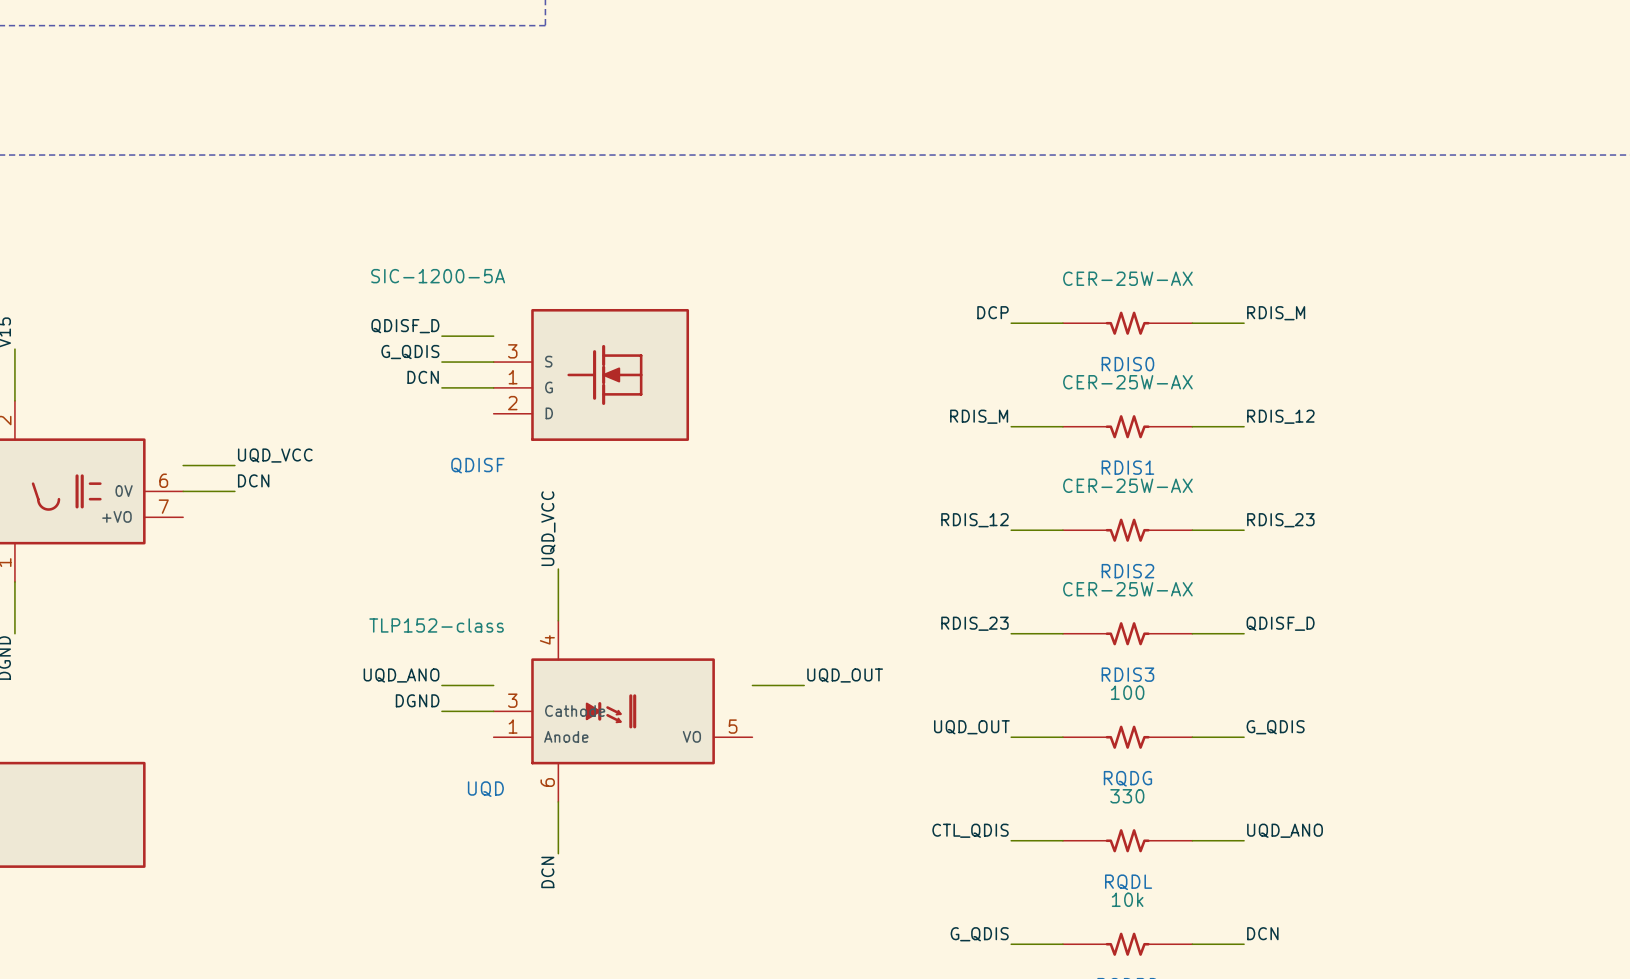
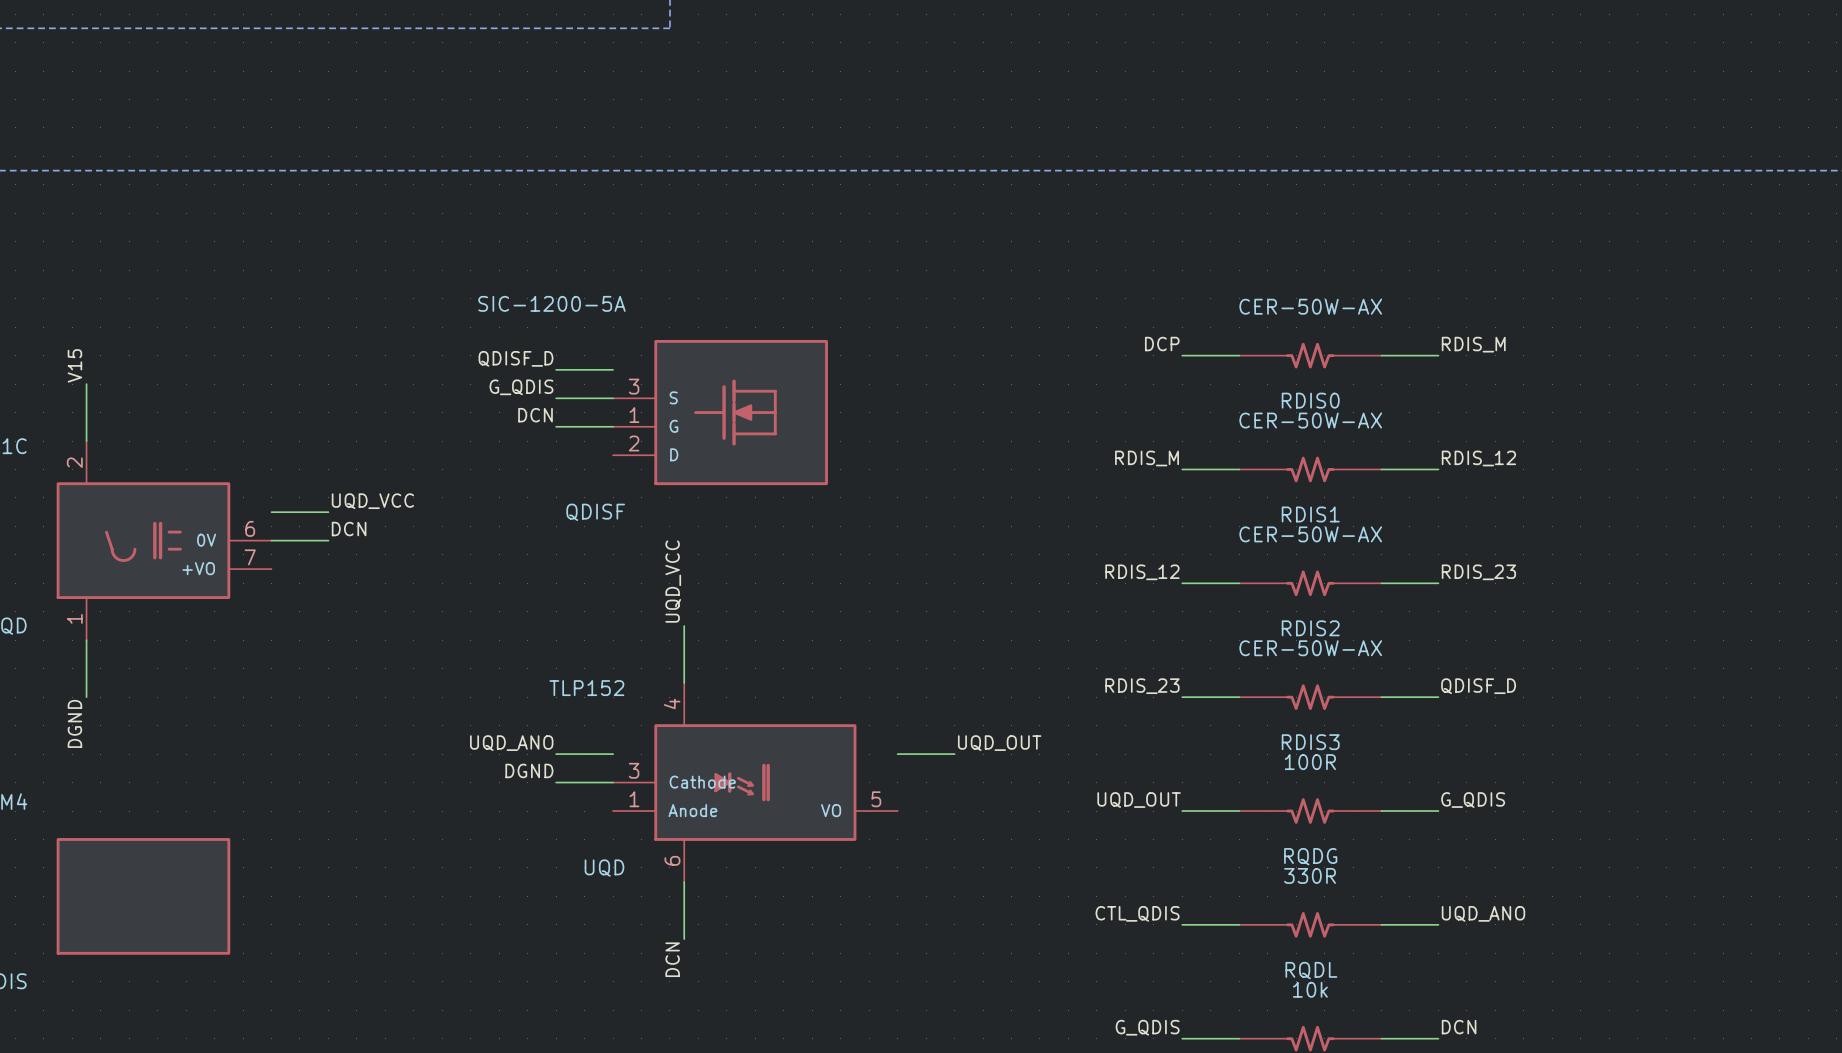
RDIS0 value: CER-25W-AX (1127, 278) -> CER-50W-AX (1310, 306)
RDIS1 value: CER-25W-AX (1127, 382) -> CER-50W-AX (1310, 420)
RDIS2 value: CER-25W-AX (1127, 485) -> CER-50W-AX (1310, 534)
RDIS3 value: CER-25W-AX (1127, 589) -> CER-50W-AX (1310, 648)
UQD value: TLP152-class (436, 625) -> TLP152 (586, 688)
RQDG value: 100 (1127, 692) -> 100R (1310, 762)
RQDL value: 330 (1127, 796) -> 330R (1310, 875)

